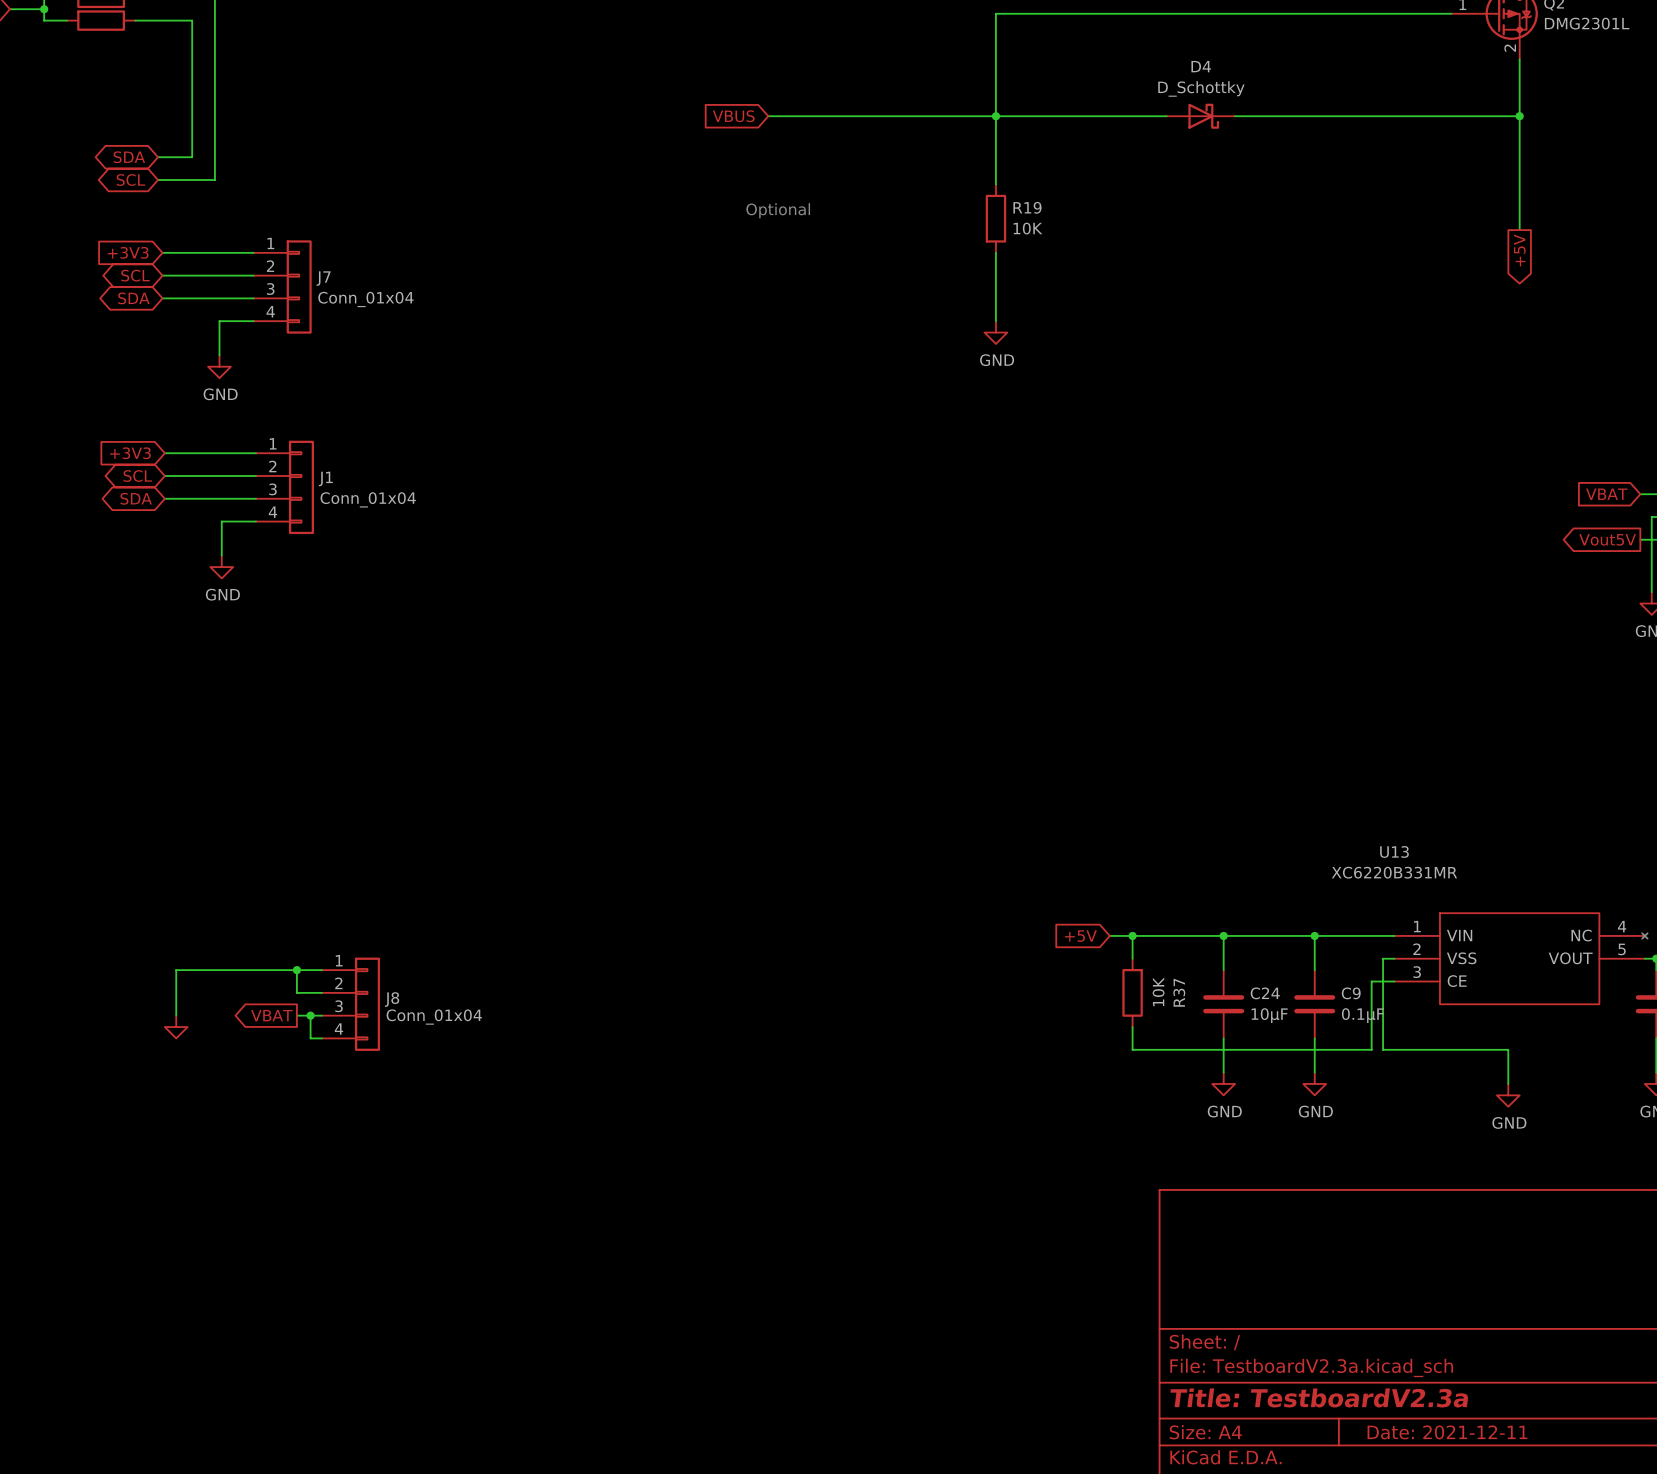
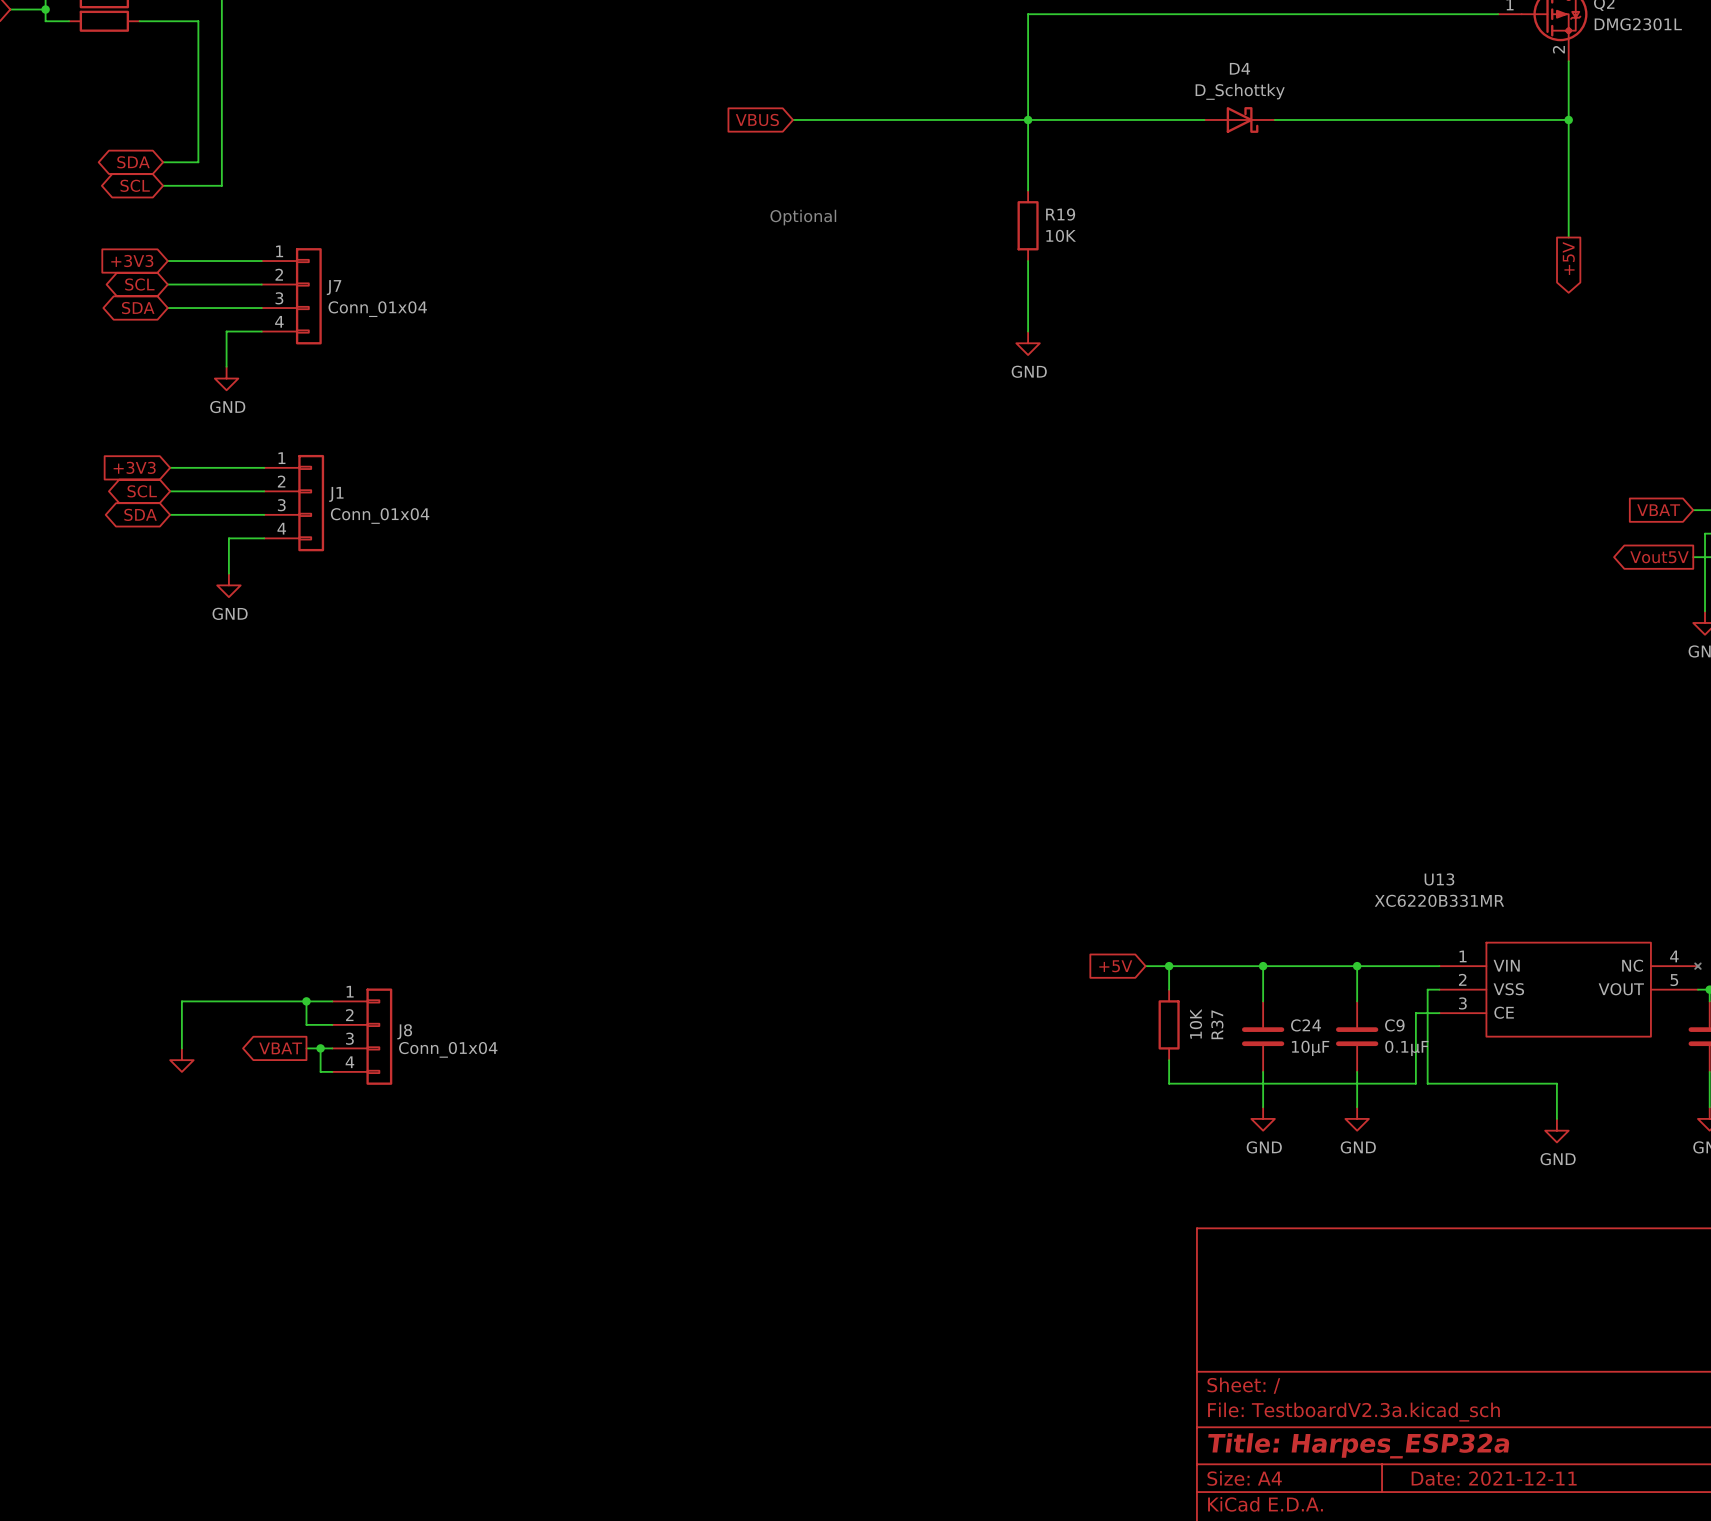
title block: Title: TestboardV2.3a (1319, 1397) -> Title: Harpes_ESP32a (1358, 1445)

